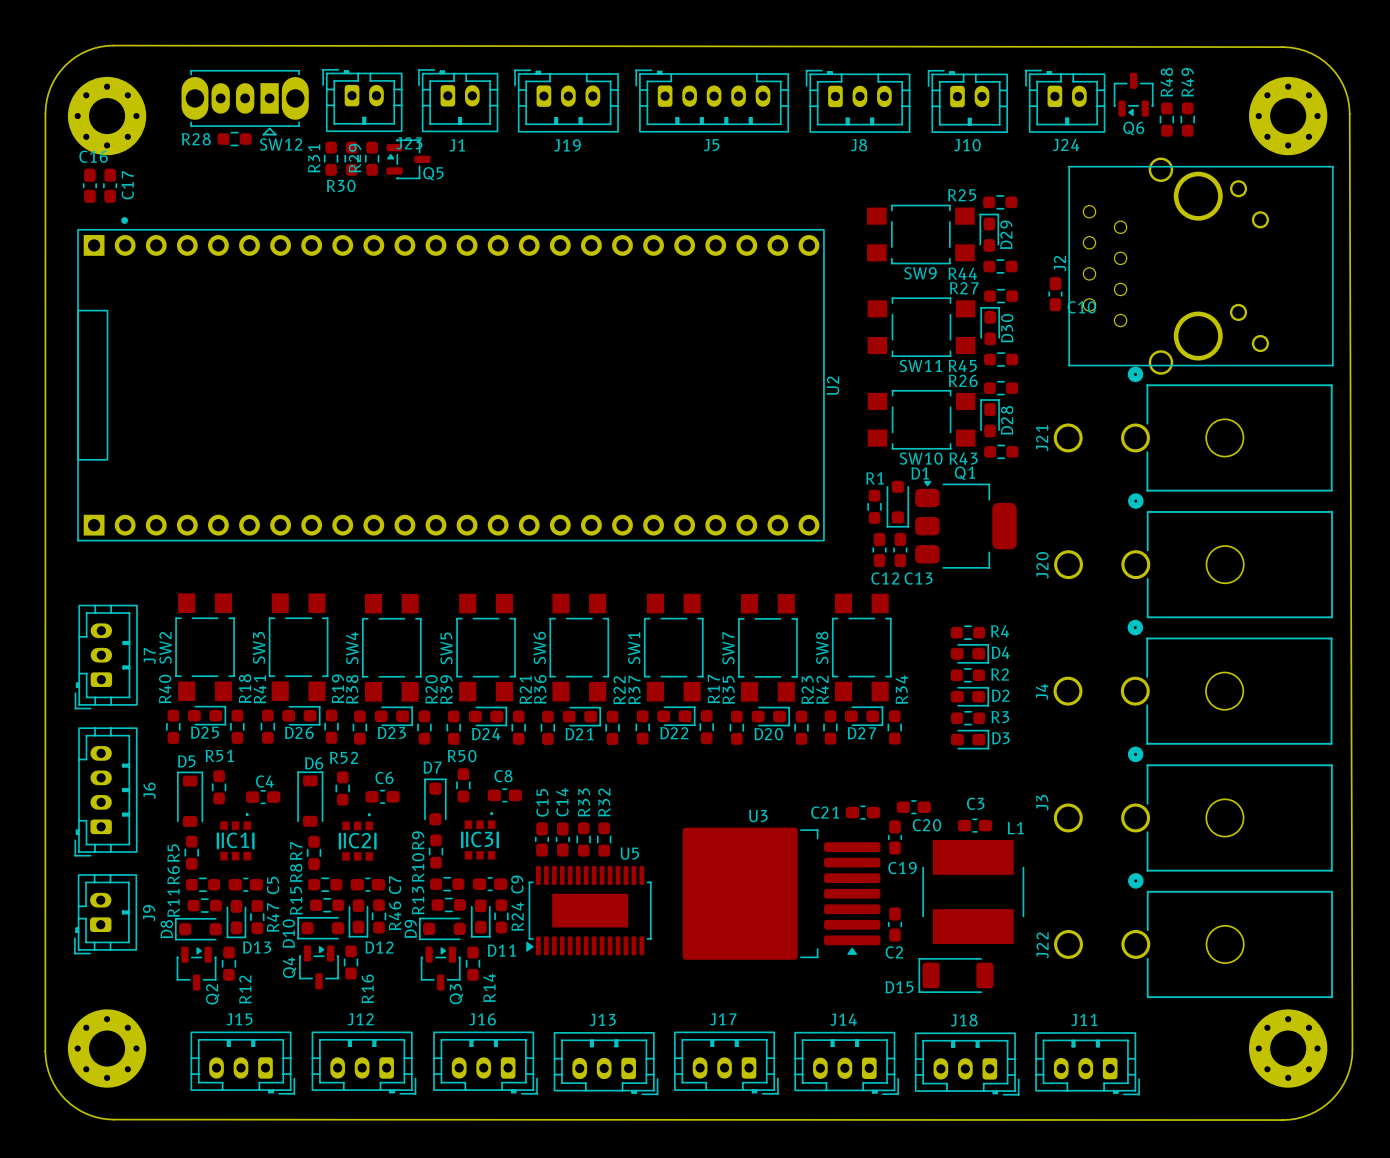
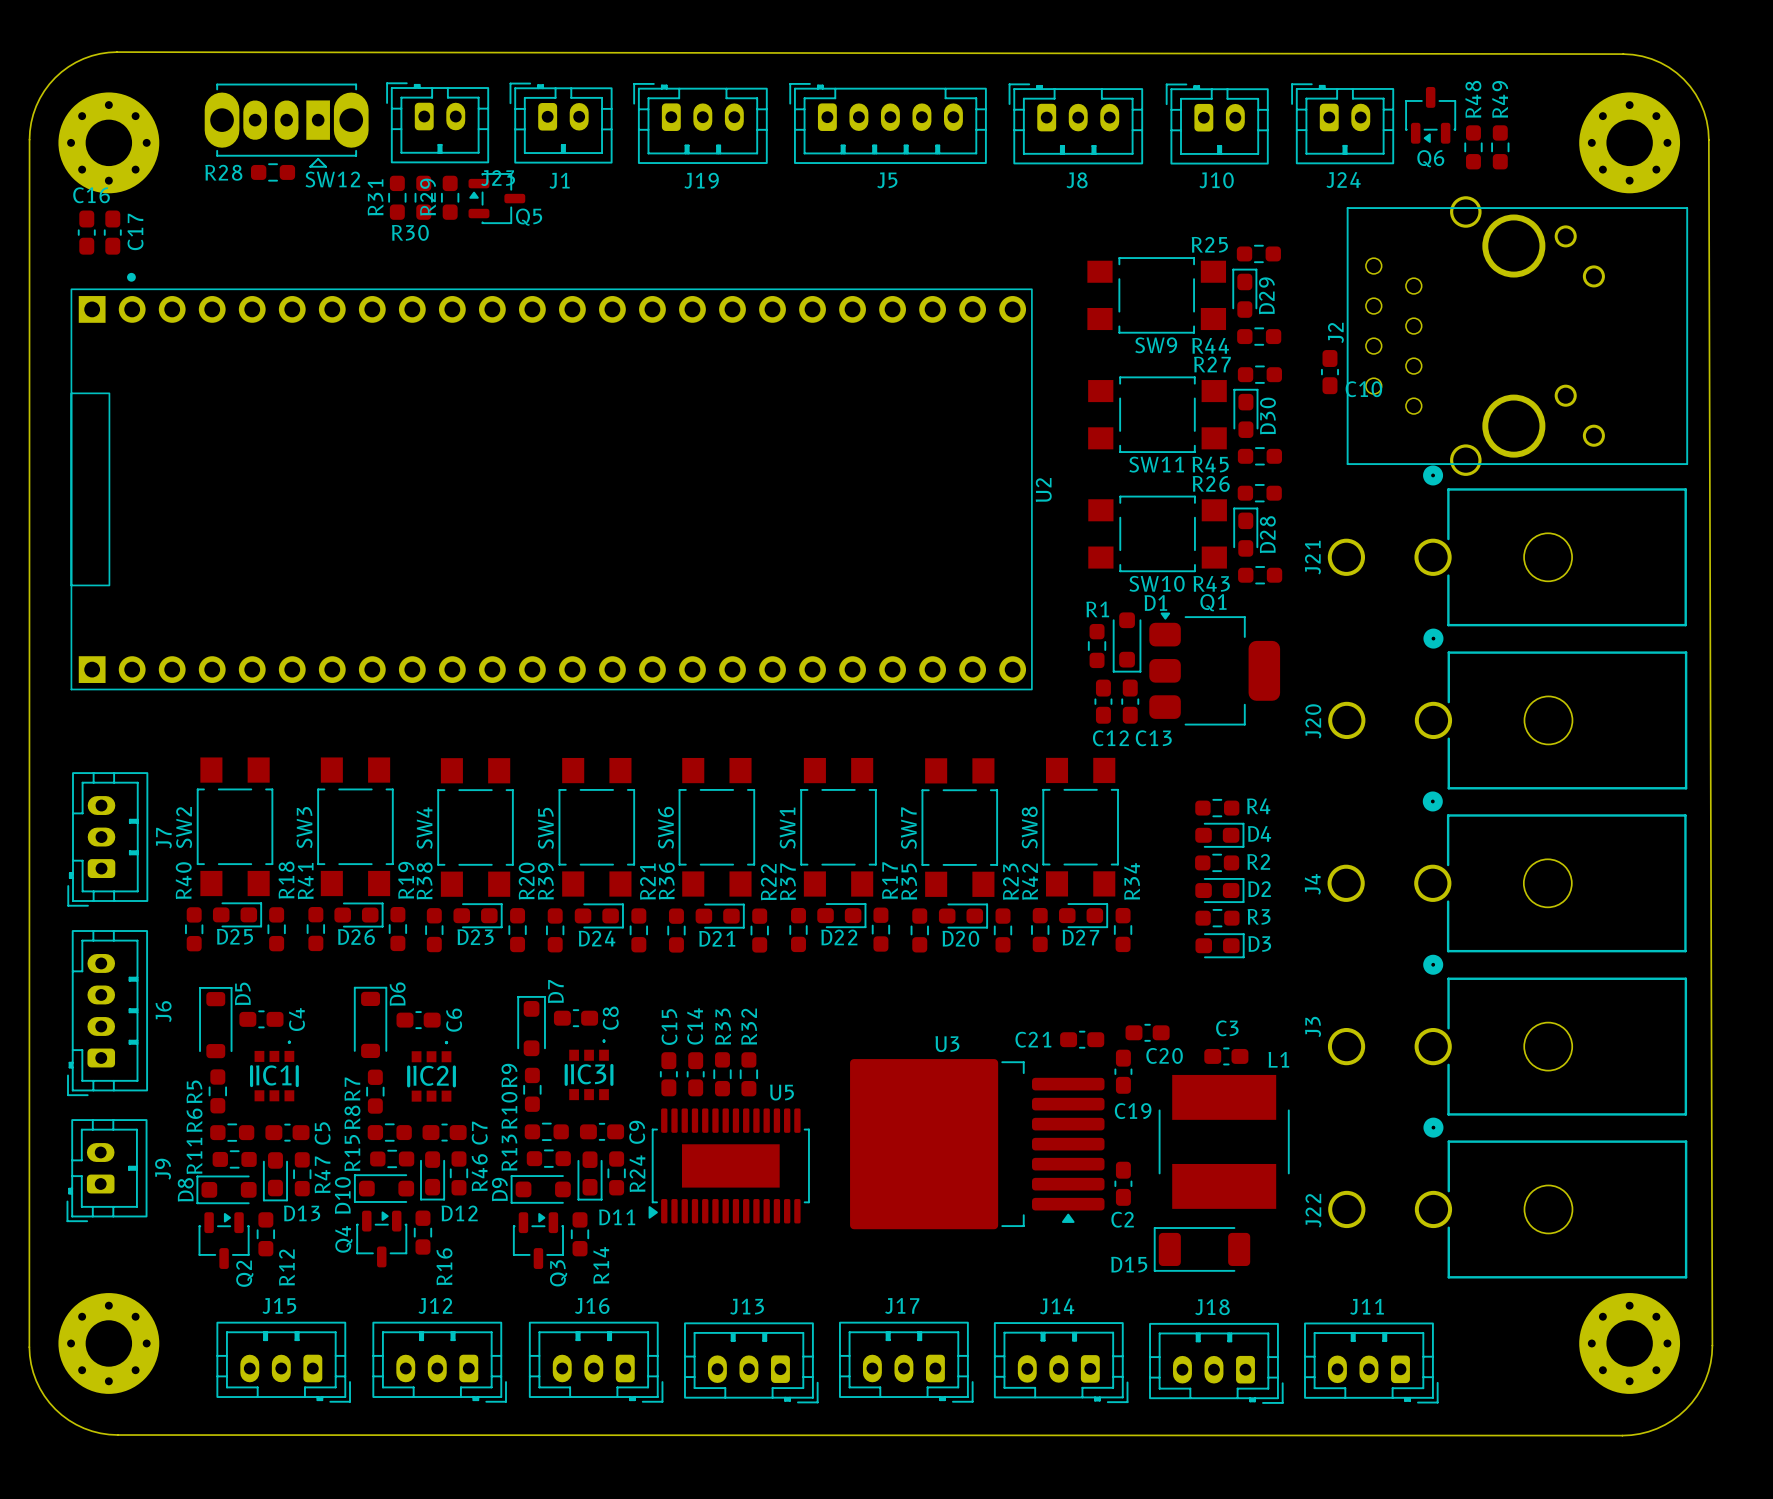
D5 name rotation: 0° (186, 761) -> 90° counterclockwise (242, 993)
D6 name rotation: 0° (314, 763) -> 90° counterclockwise (397, 994)
D7 name rotation: 0° (432, 767) -> 90° counterclockwise (555, 991)
C8 name rotation: 0° (503, 776) -> 90° counterclockwise (610, 1018)
C6 name rotation: 0° (384, 778) -> 90° counterclockwise (454, 1020)
C4 name rotation: 0° (264, 781) -> 90° counterclockwise (296, 1019)
R50: (463, 785) -> none
R51: (219, 787) -> none
R52: (342, 788) -> none
C8 position: (504, 795) -> (576, 1018)
C6 position: (382, 796) -> (418, 1020)
C4 position: (263, 797) -> (261, 1019)

